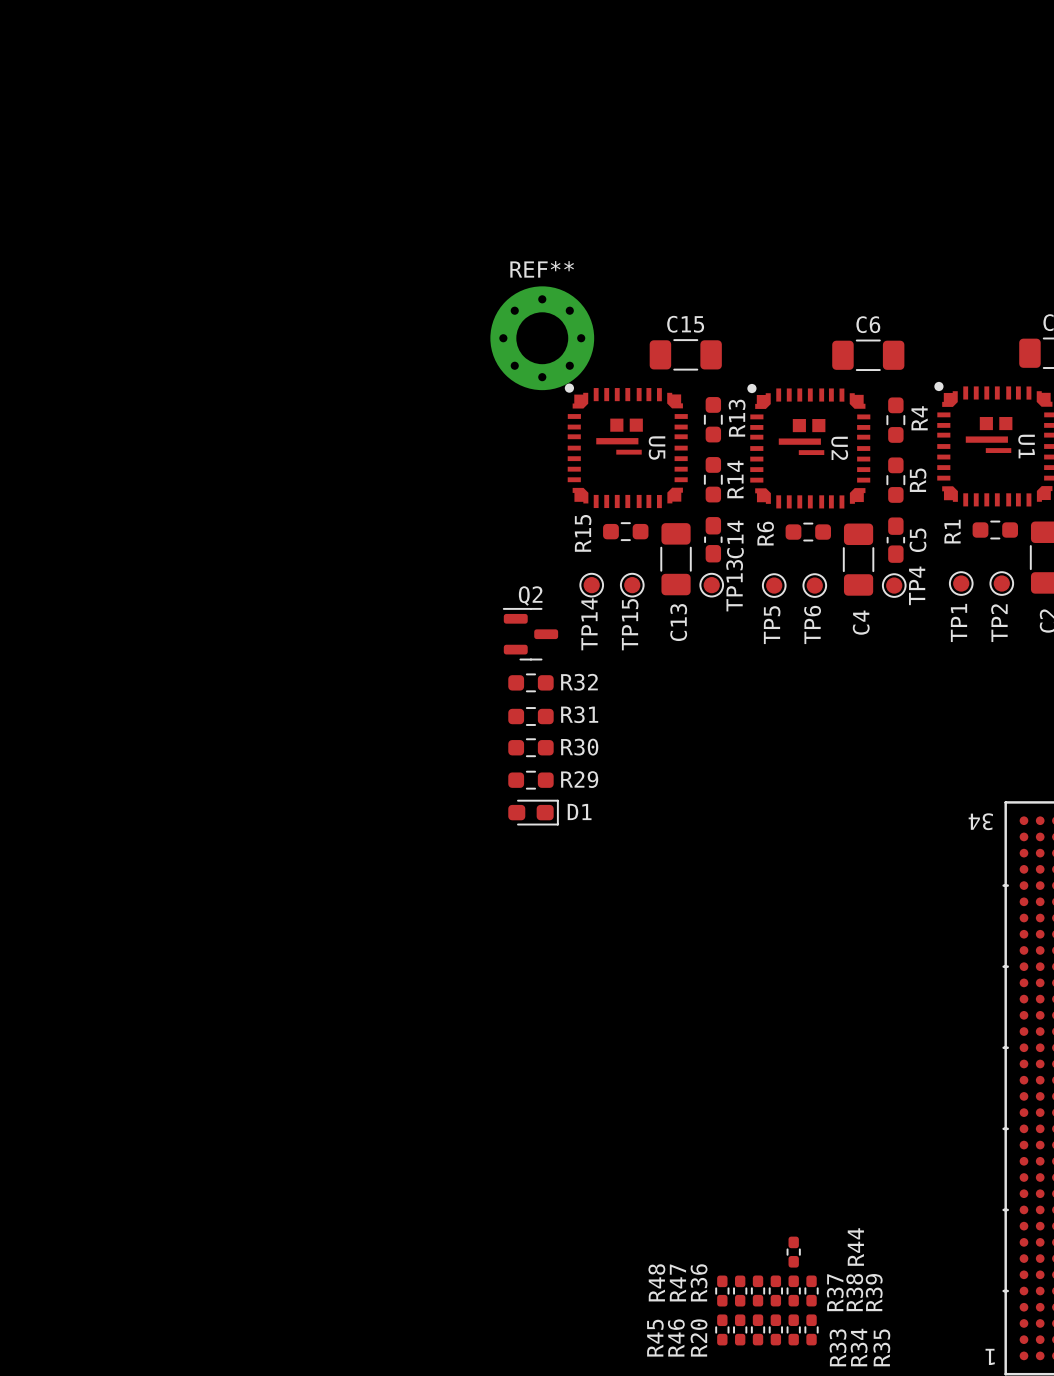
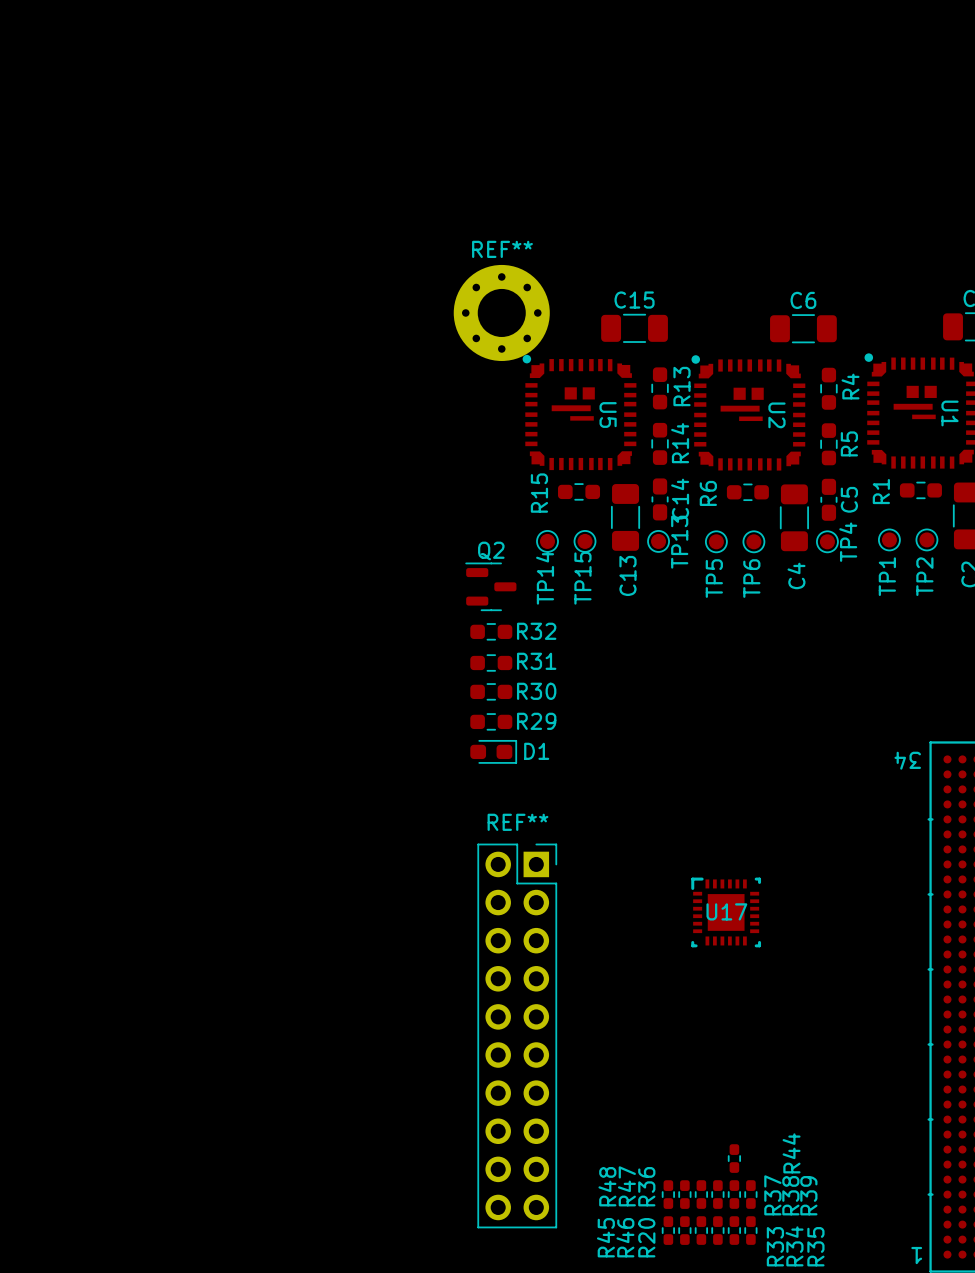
U17: none -> (726, 912)
REF**: none -> (517, 1035)

